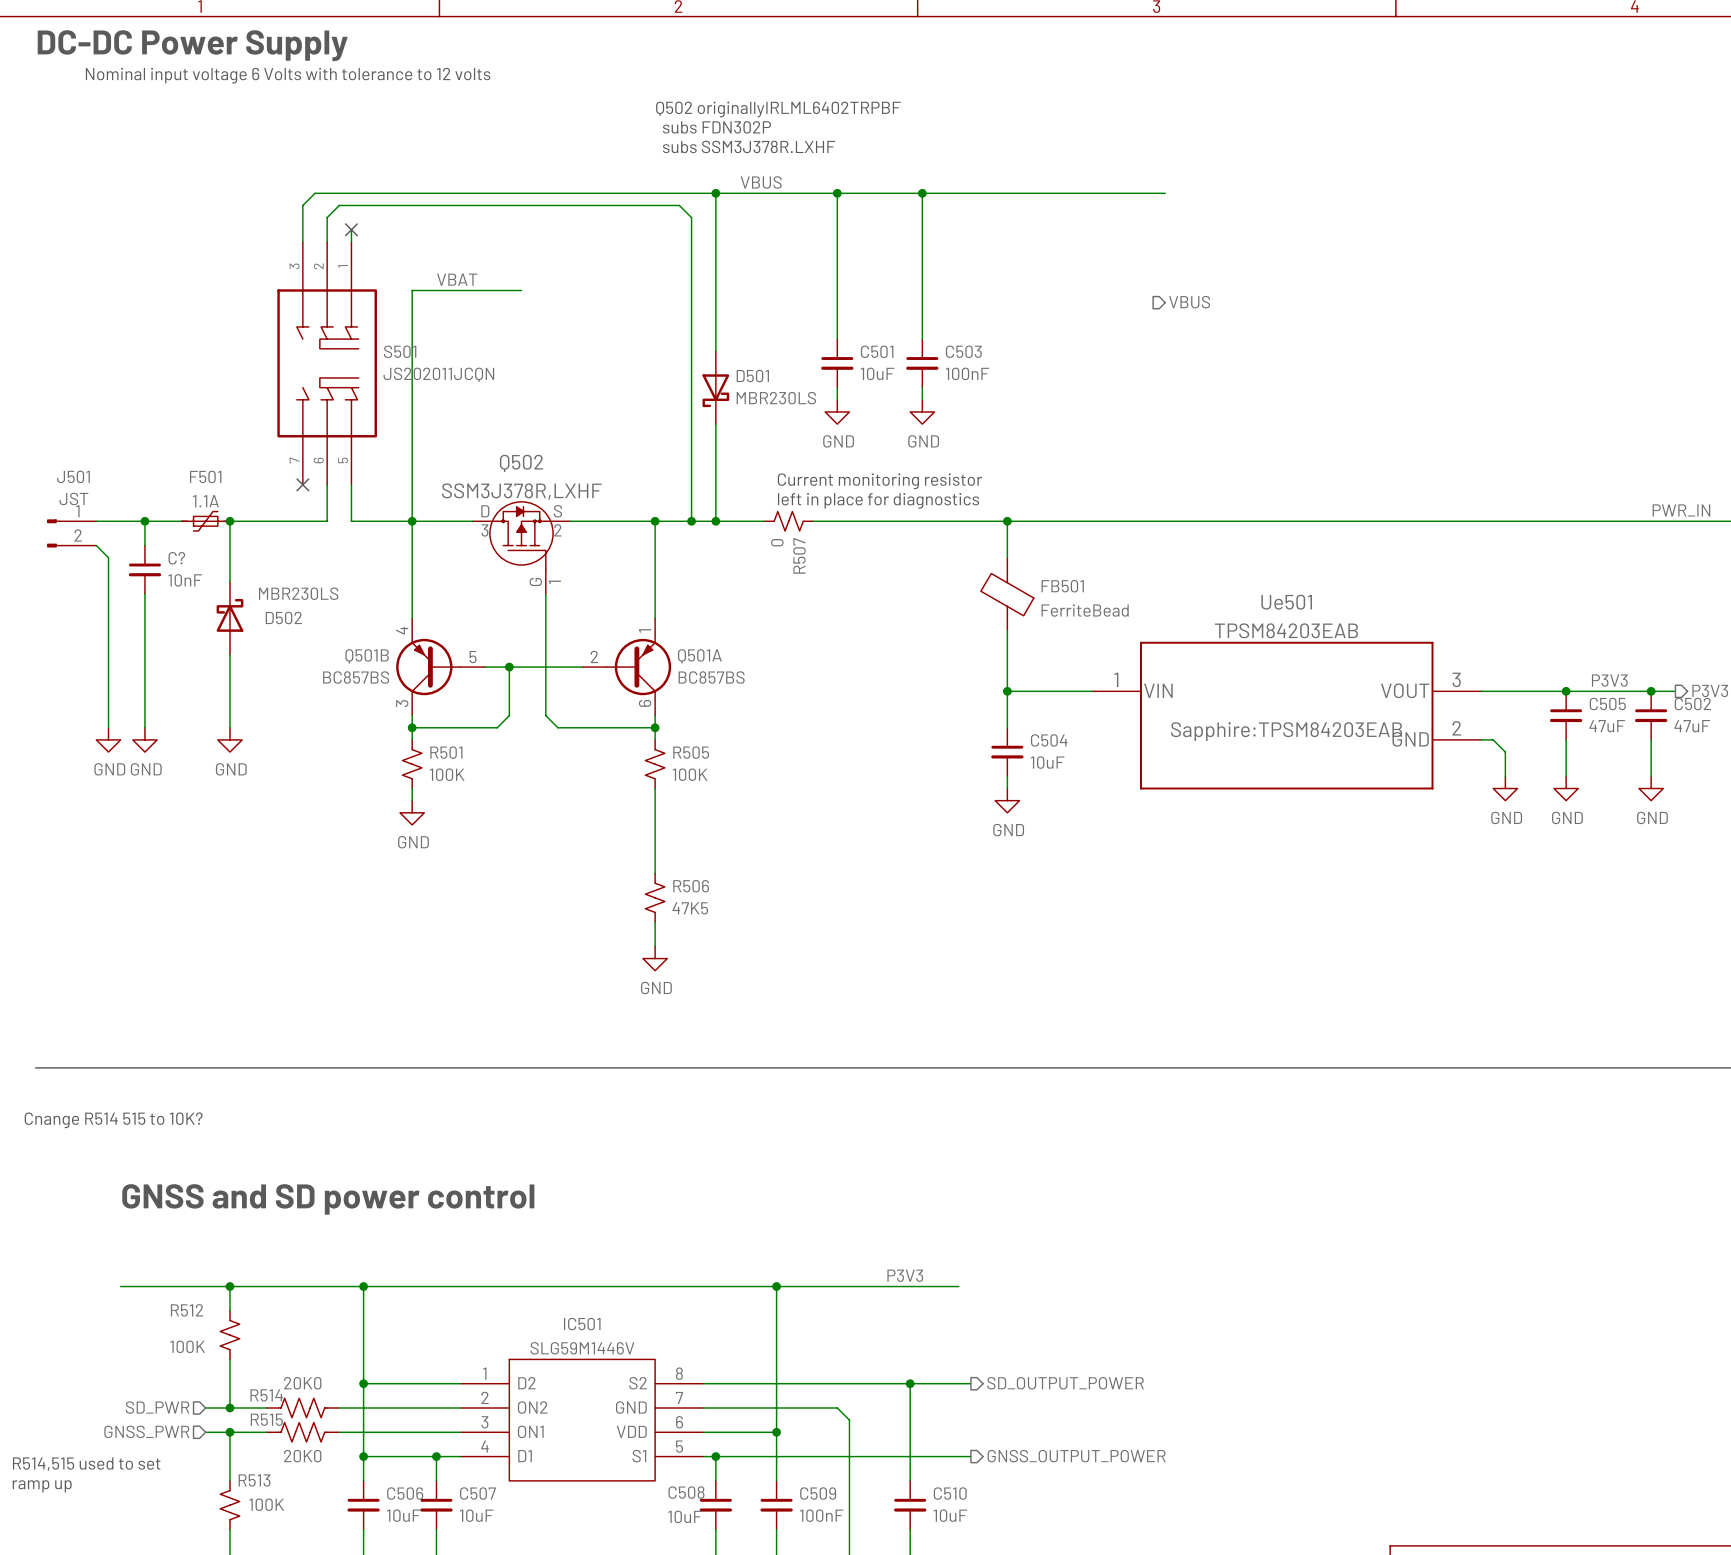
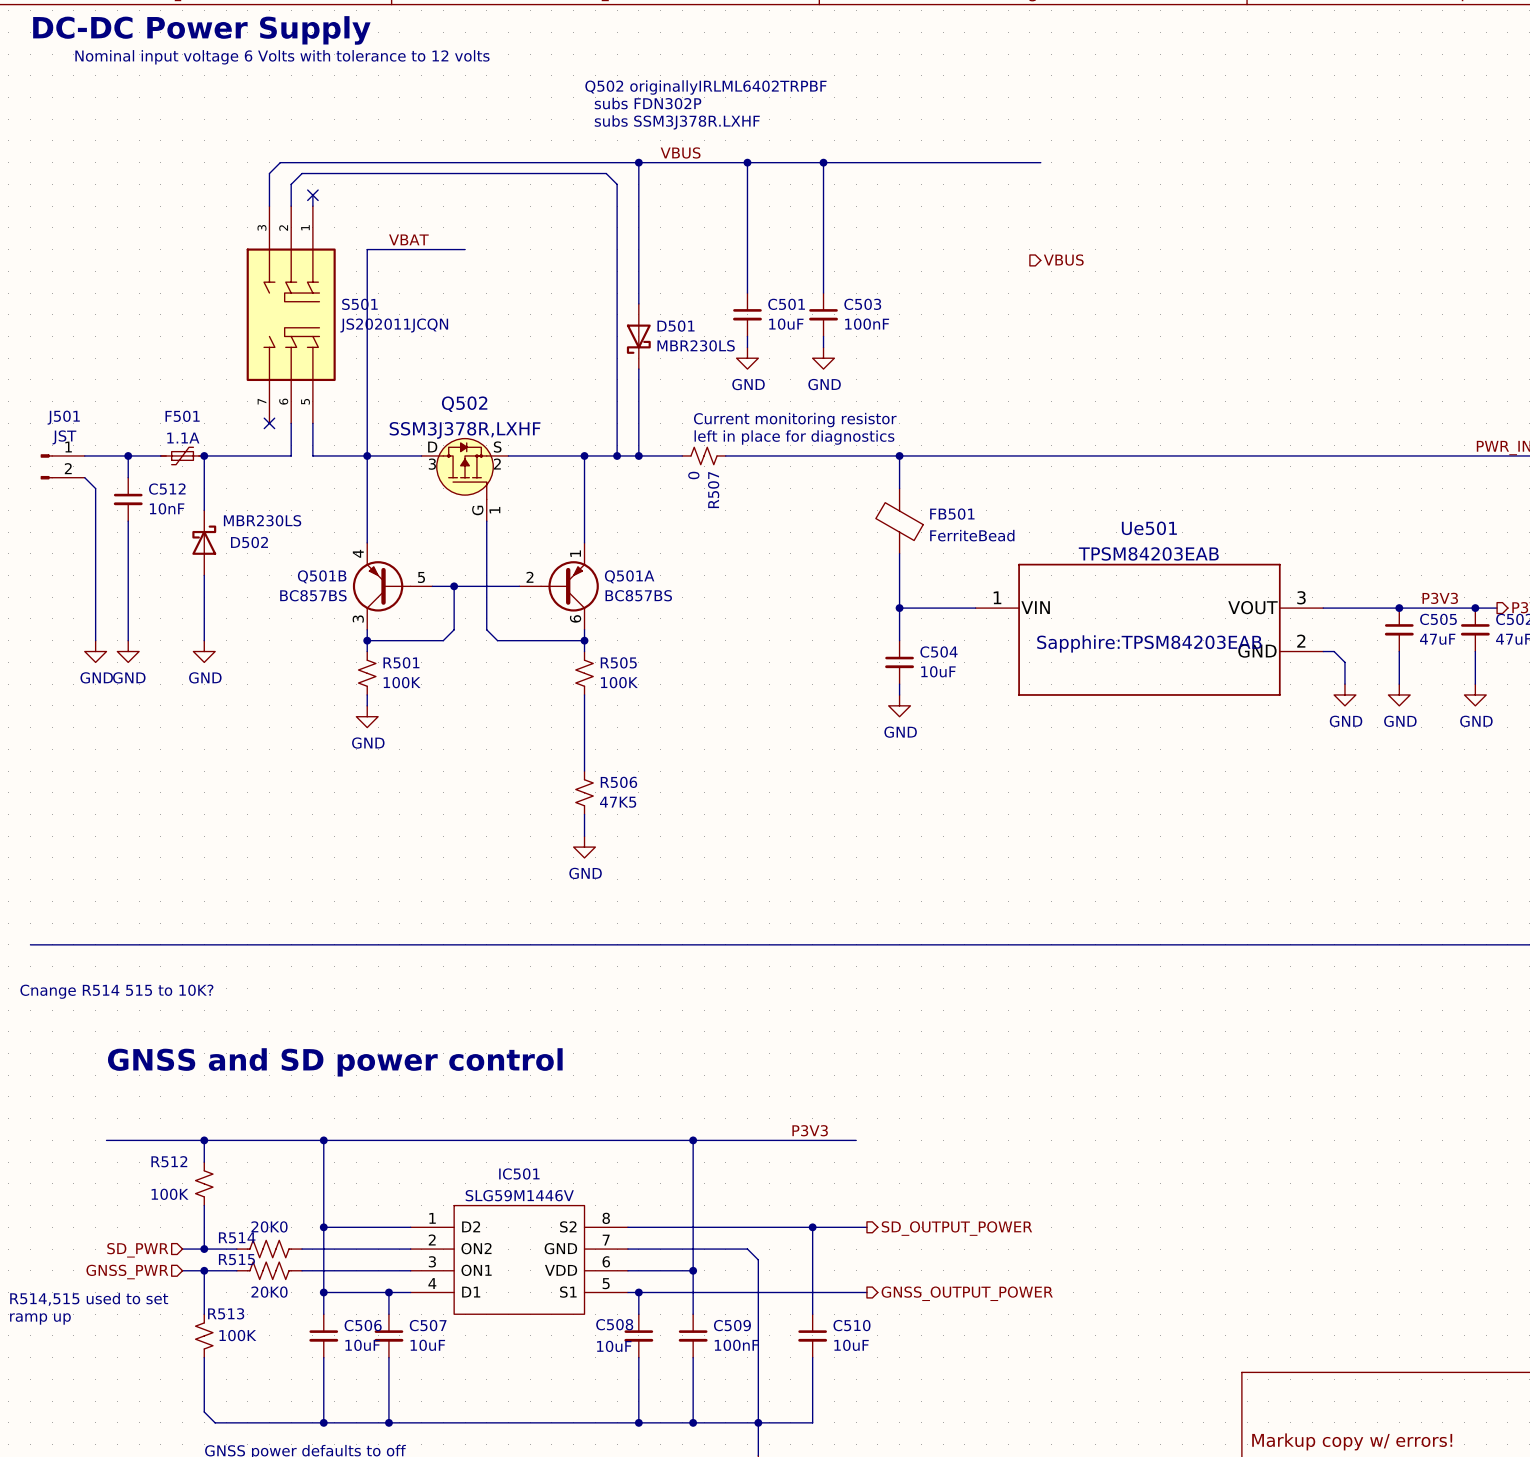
C? name: C? (176, 558) -> C512 (167, 489)

